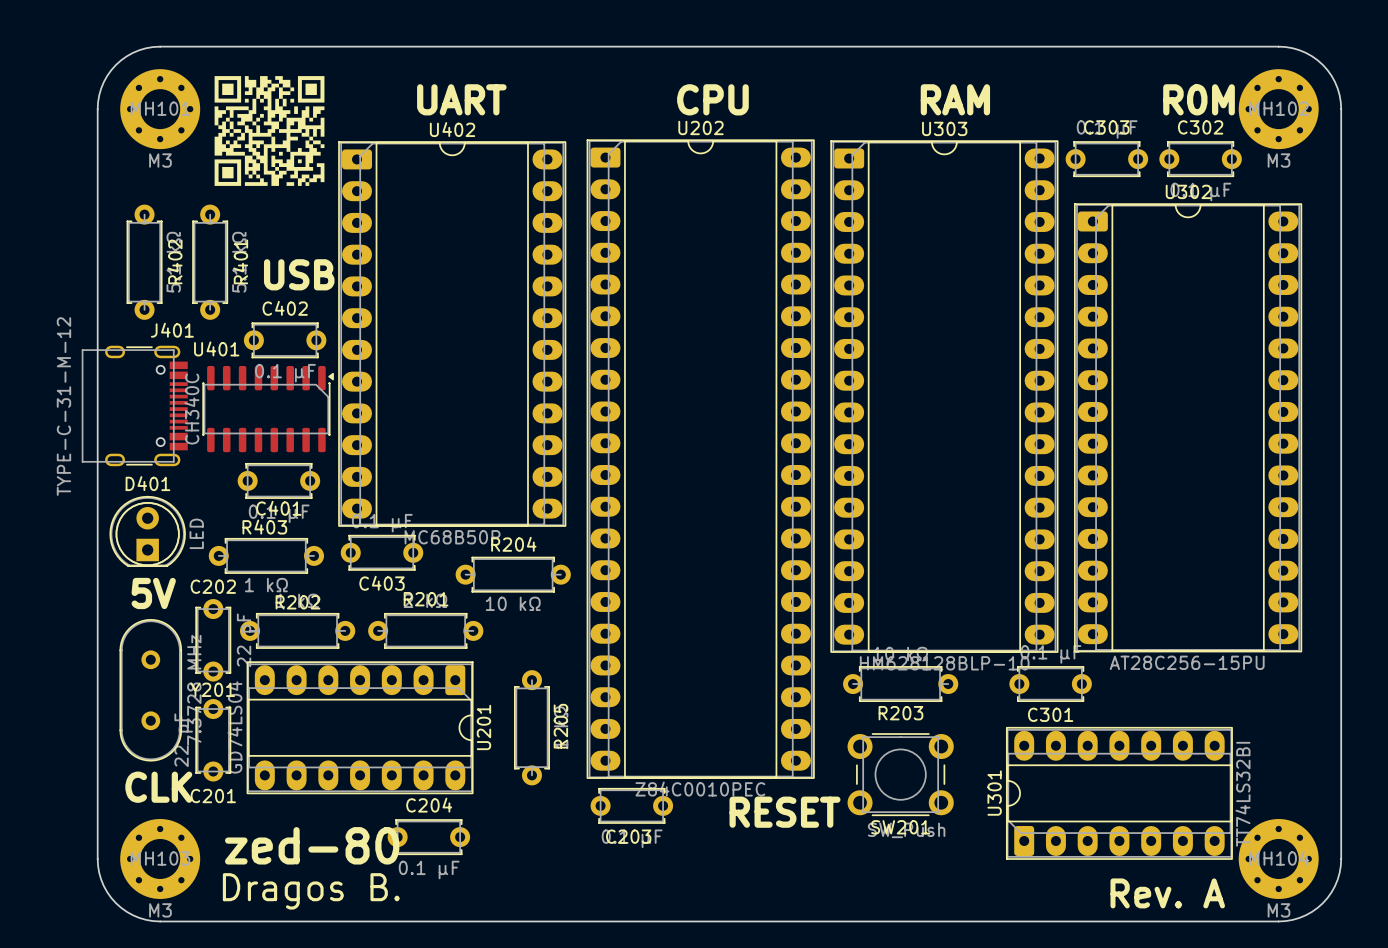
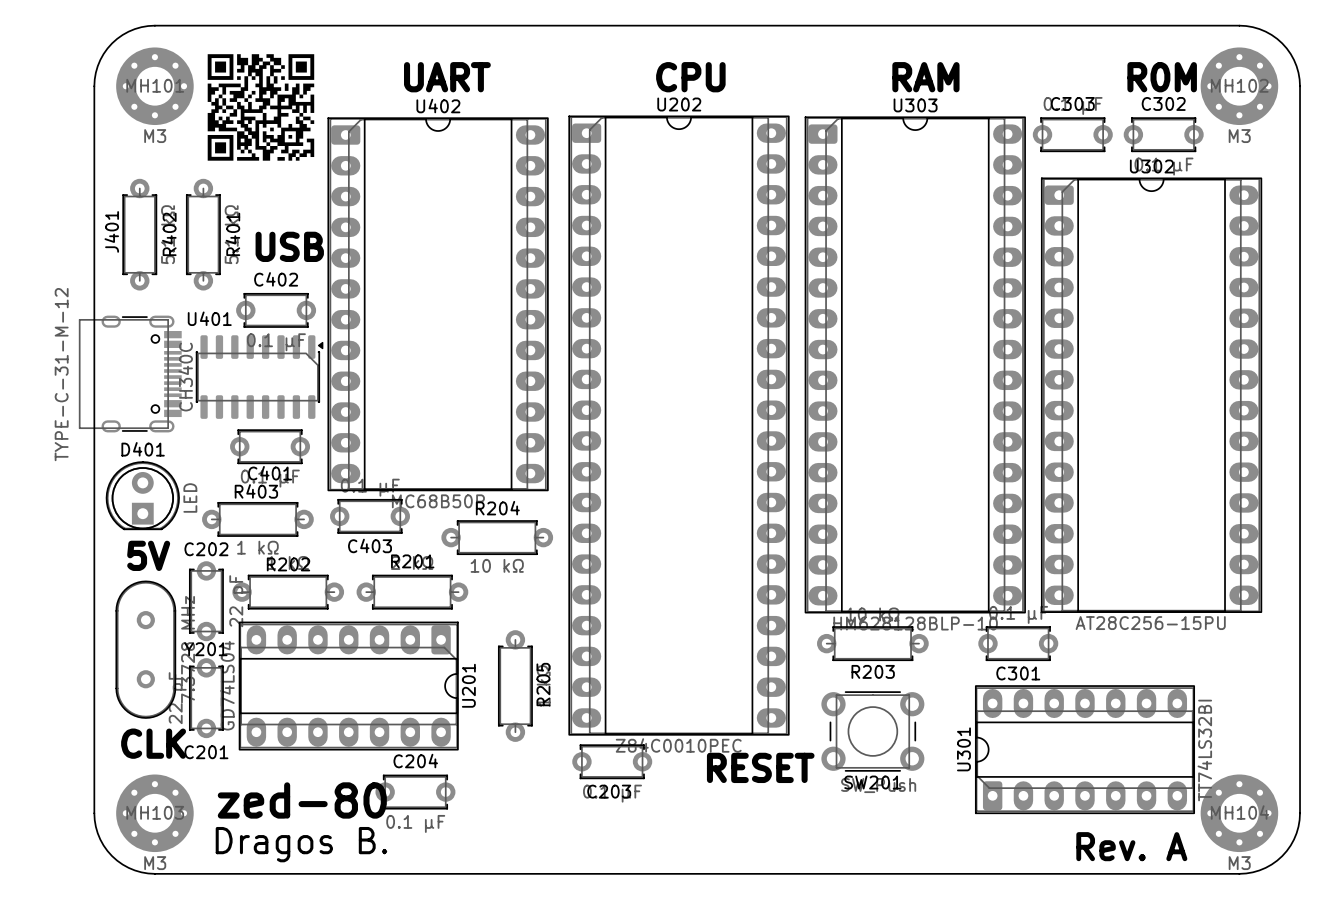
J401 name rotation: 0° (172, 330) -> 90° counterclockwise (111, 231)
J401 name position: J401 (172, 330) -> J401 (111, 231)

